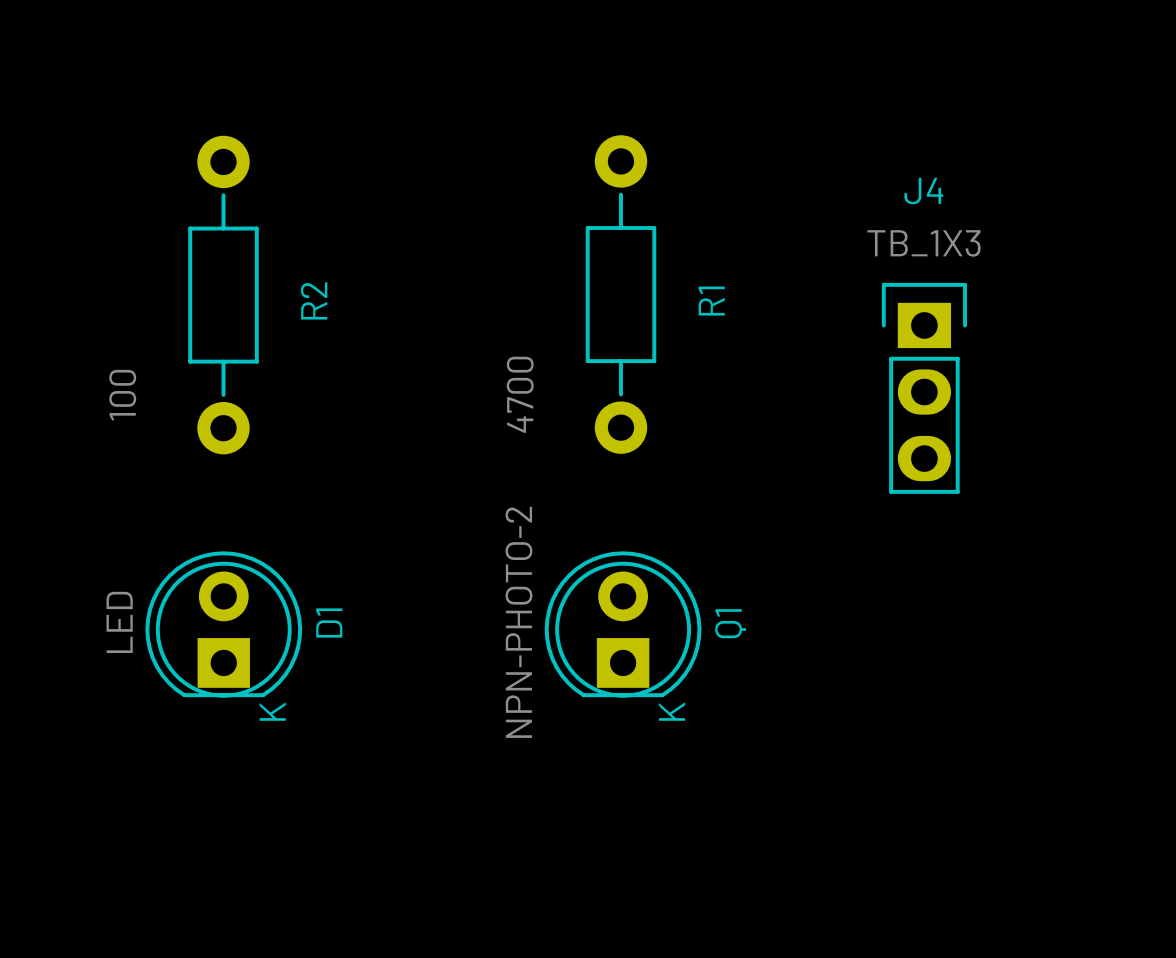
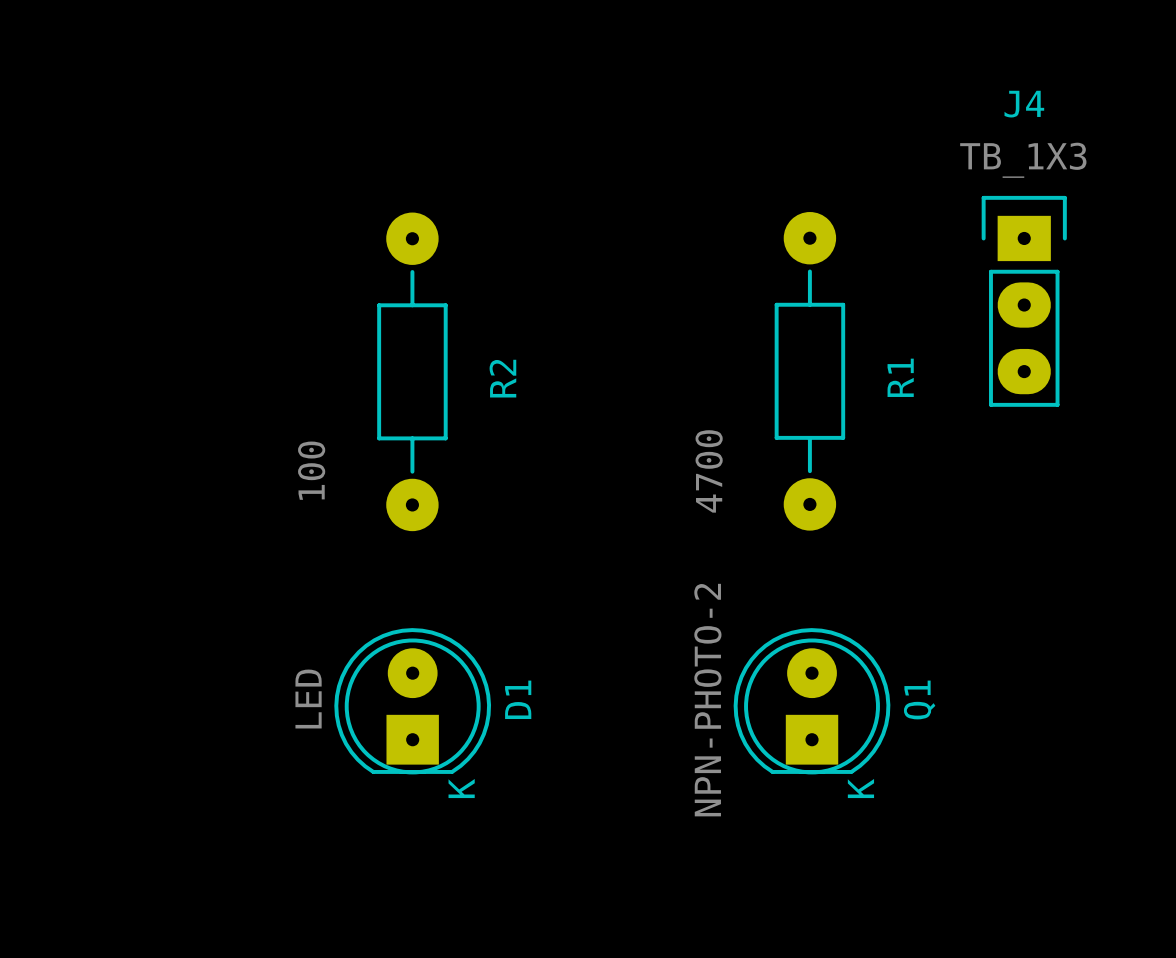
R2 footprint: [188, 135, 259, 455] -> [377, 212, 448, 532]
R1 footprint: [585, 135, 657, 454] -> [774, 212, 846, 531]
J4 footprint: [881, 282, 968, 494] -> [981, 195, 1067, 407]
D1 footprint: [145, 551, 303, 698] -> [334, 628, 492, 775]
Q1 footprint: [544, 551, 702, 698] -> [733, 628, 891, 775]

